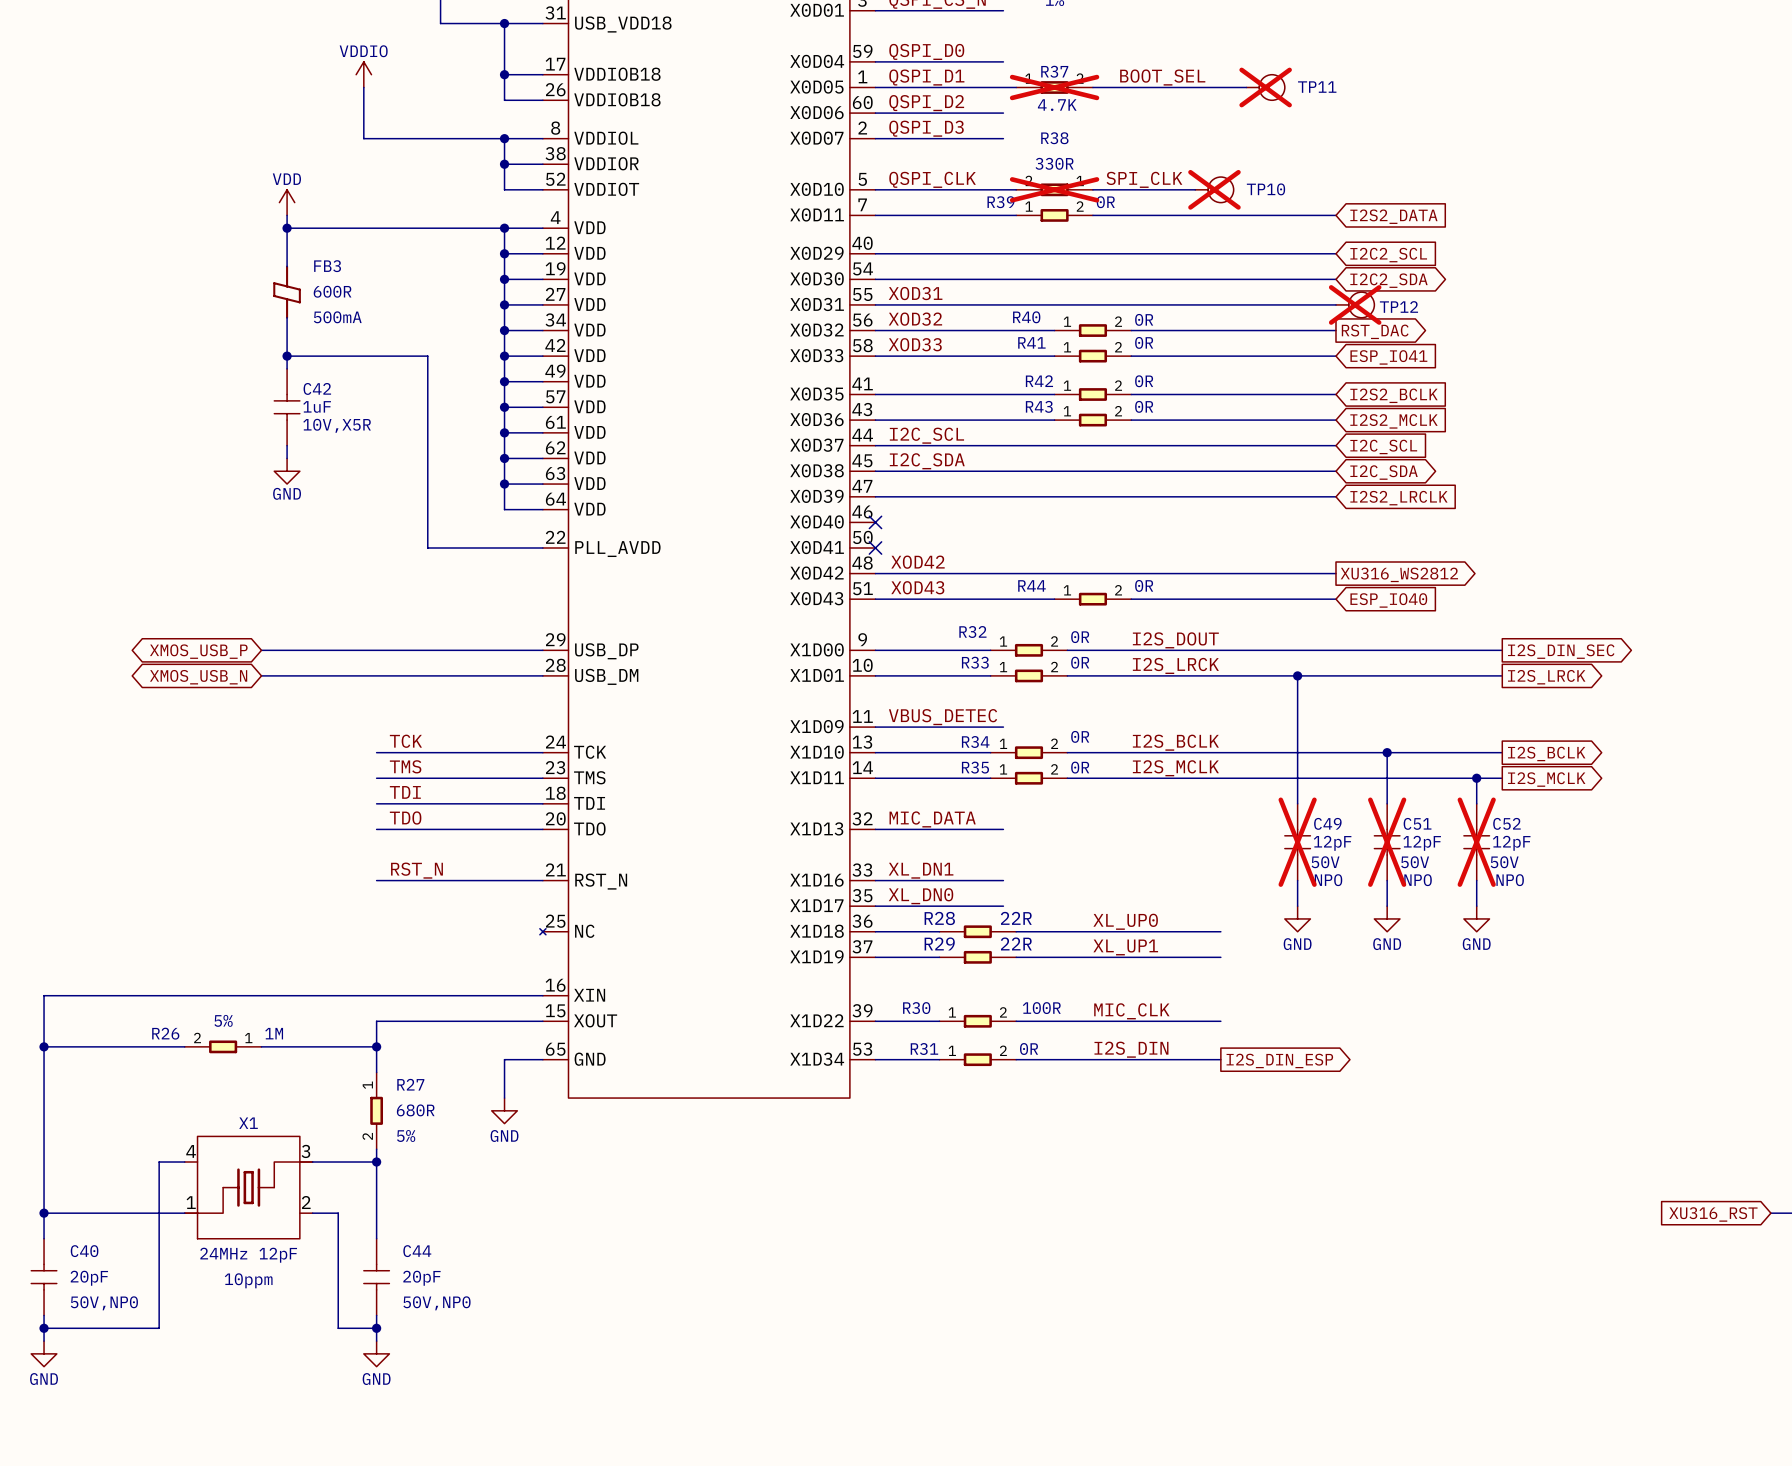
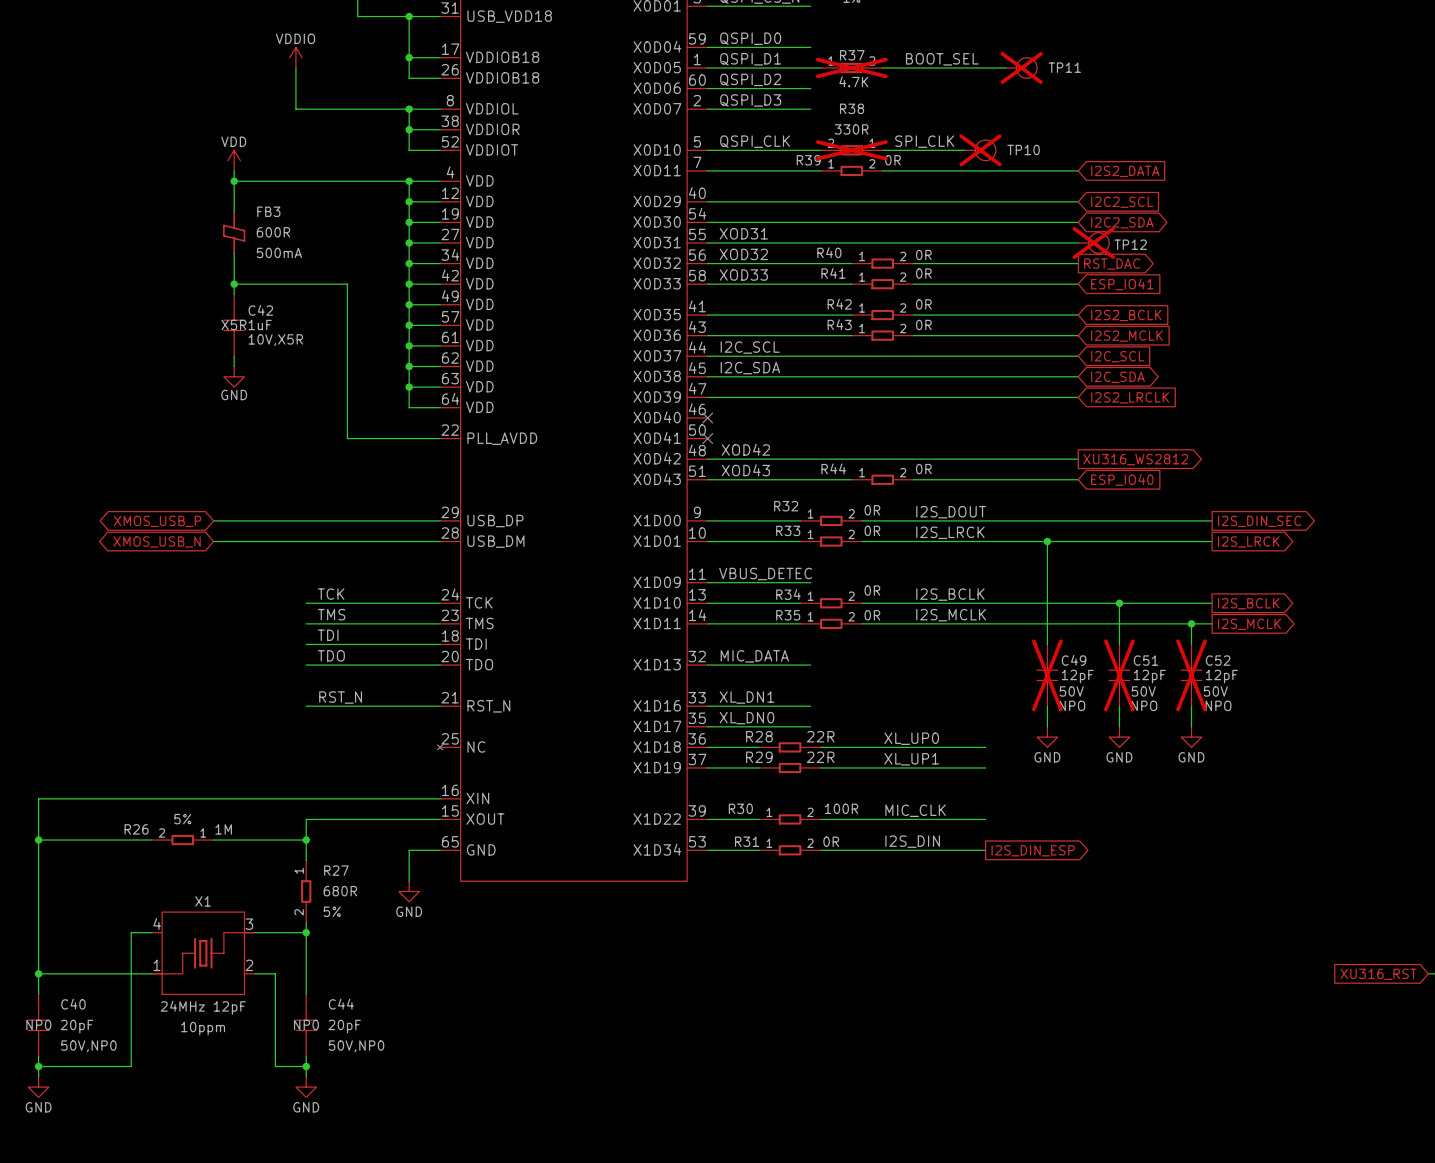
C42 text: none -> X5R (233, 324)
C40 text: none -> NP0 (38, 1024)
C44 text: none -> NP0 (306, 1024)

